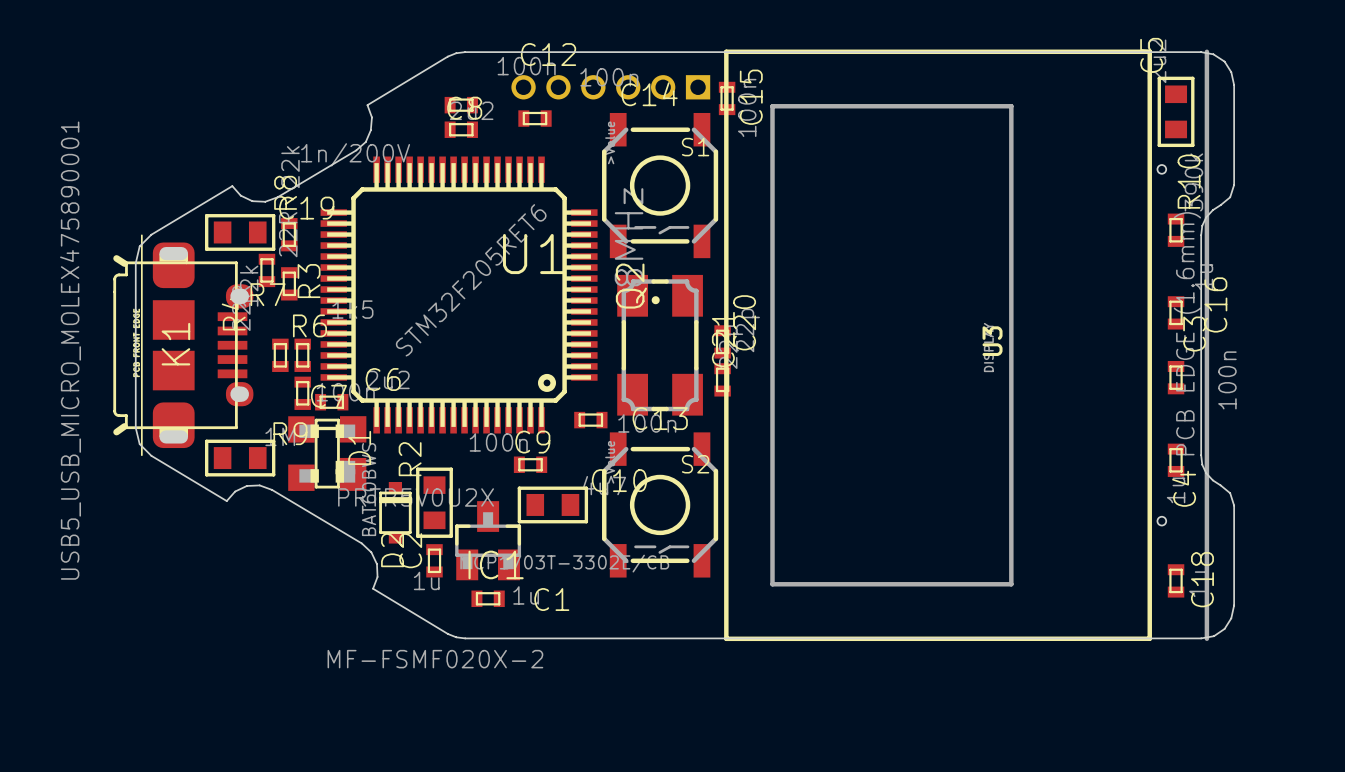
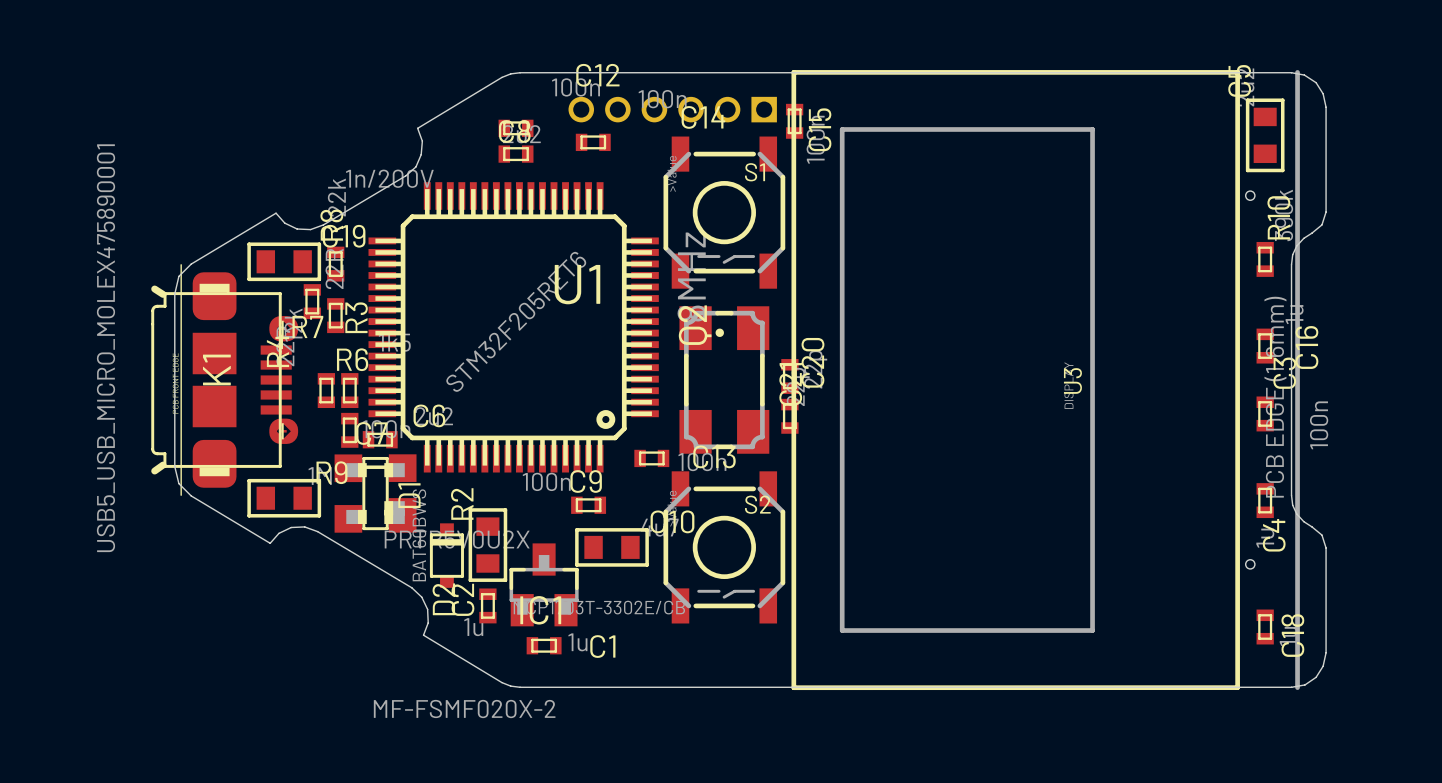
K1 footprint: [113, 234, 254, 456] -> [151, 264, 299, 496]

